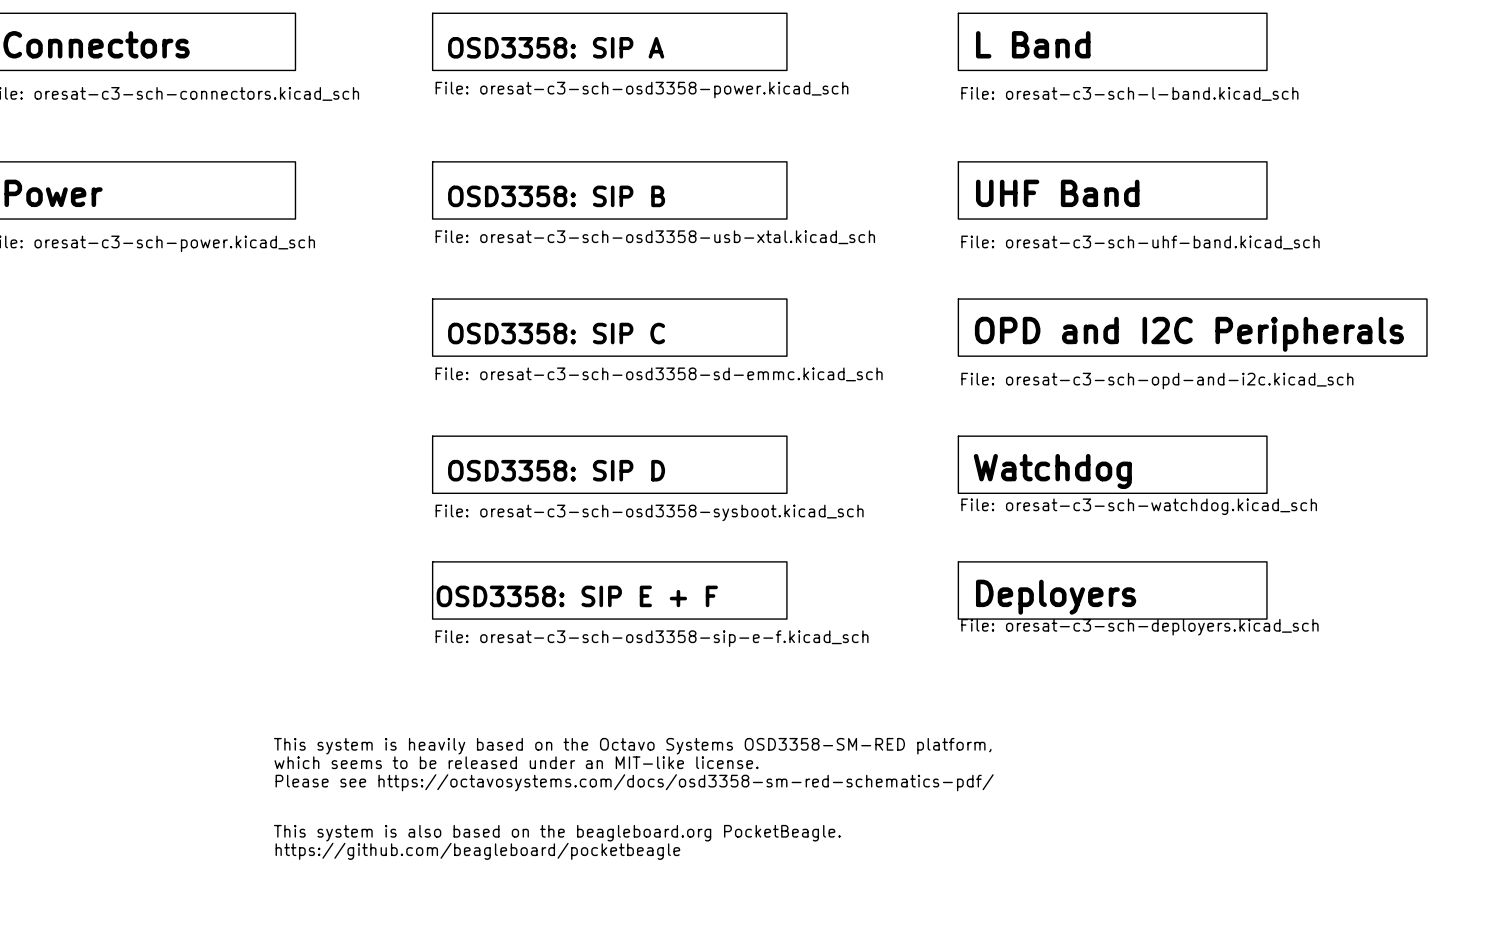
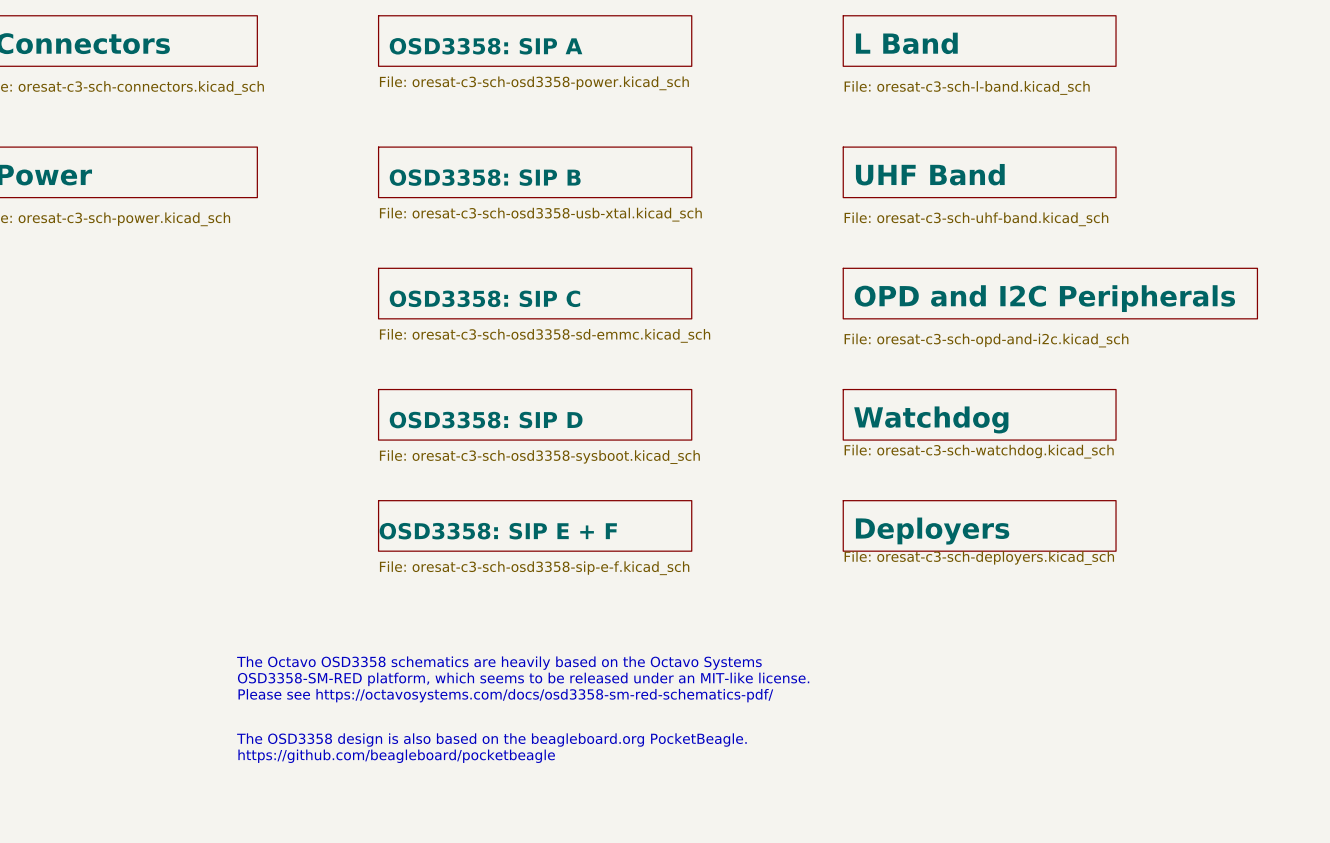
text: This system is heavily based on the Octavo Systems OSD3358-SM-RED platform, (632, 746) -> The Octavo OSD3358 schematics are heavily based on the Octavo Systems (499, 663)
text: which seems to be released under an MIT-like license. (516, 762) -> OSD3358-SM-RED platform, which seems to be released under an MIT-like license. (523, 679)
text: This system is also based on the beagleboard.org PocketBeagle. (557, 833) -> The OSD3358 design is also based on the beagleboard.org PocketBeagle. (491, 740)

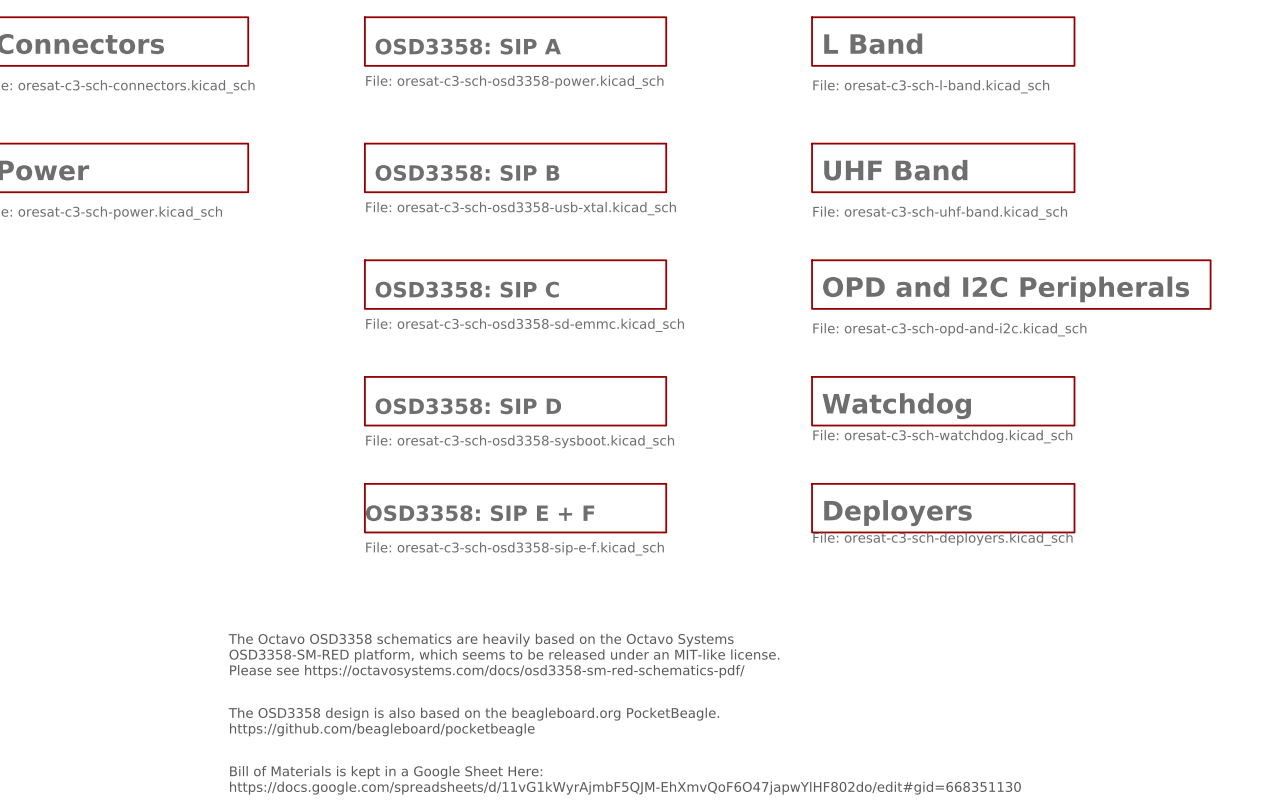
text: none -> Bill of Materials is kept in a Google Sheet Here: (386, 772)
text: none -> https://docs.google.com/spreadsheets/d/11vG1kWyrAjmbF5QJM-EhXmvQoF6O47japwYlHF802do/edit#gid=668351130 (625, 788)

